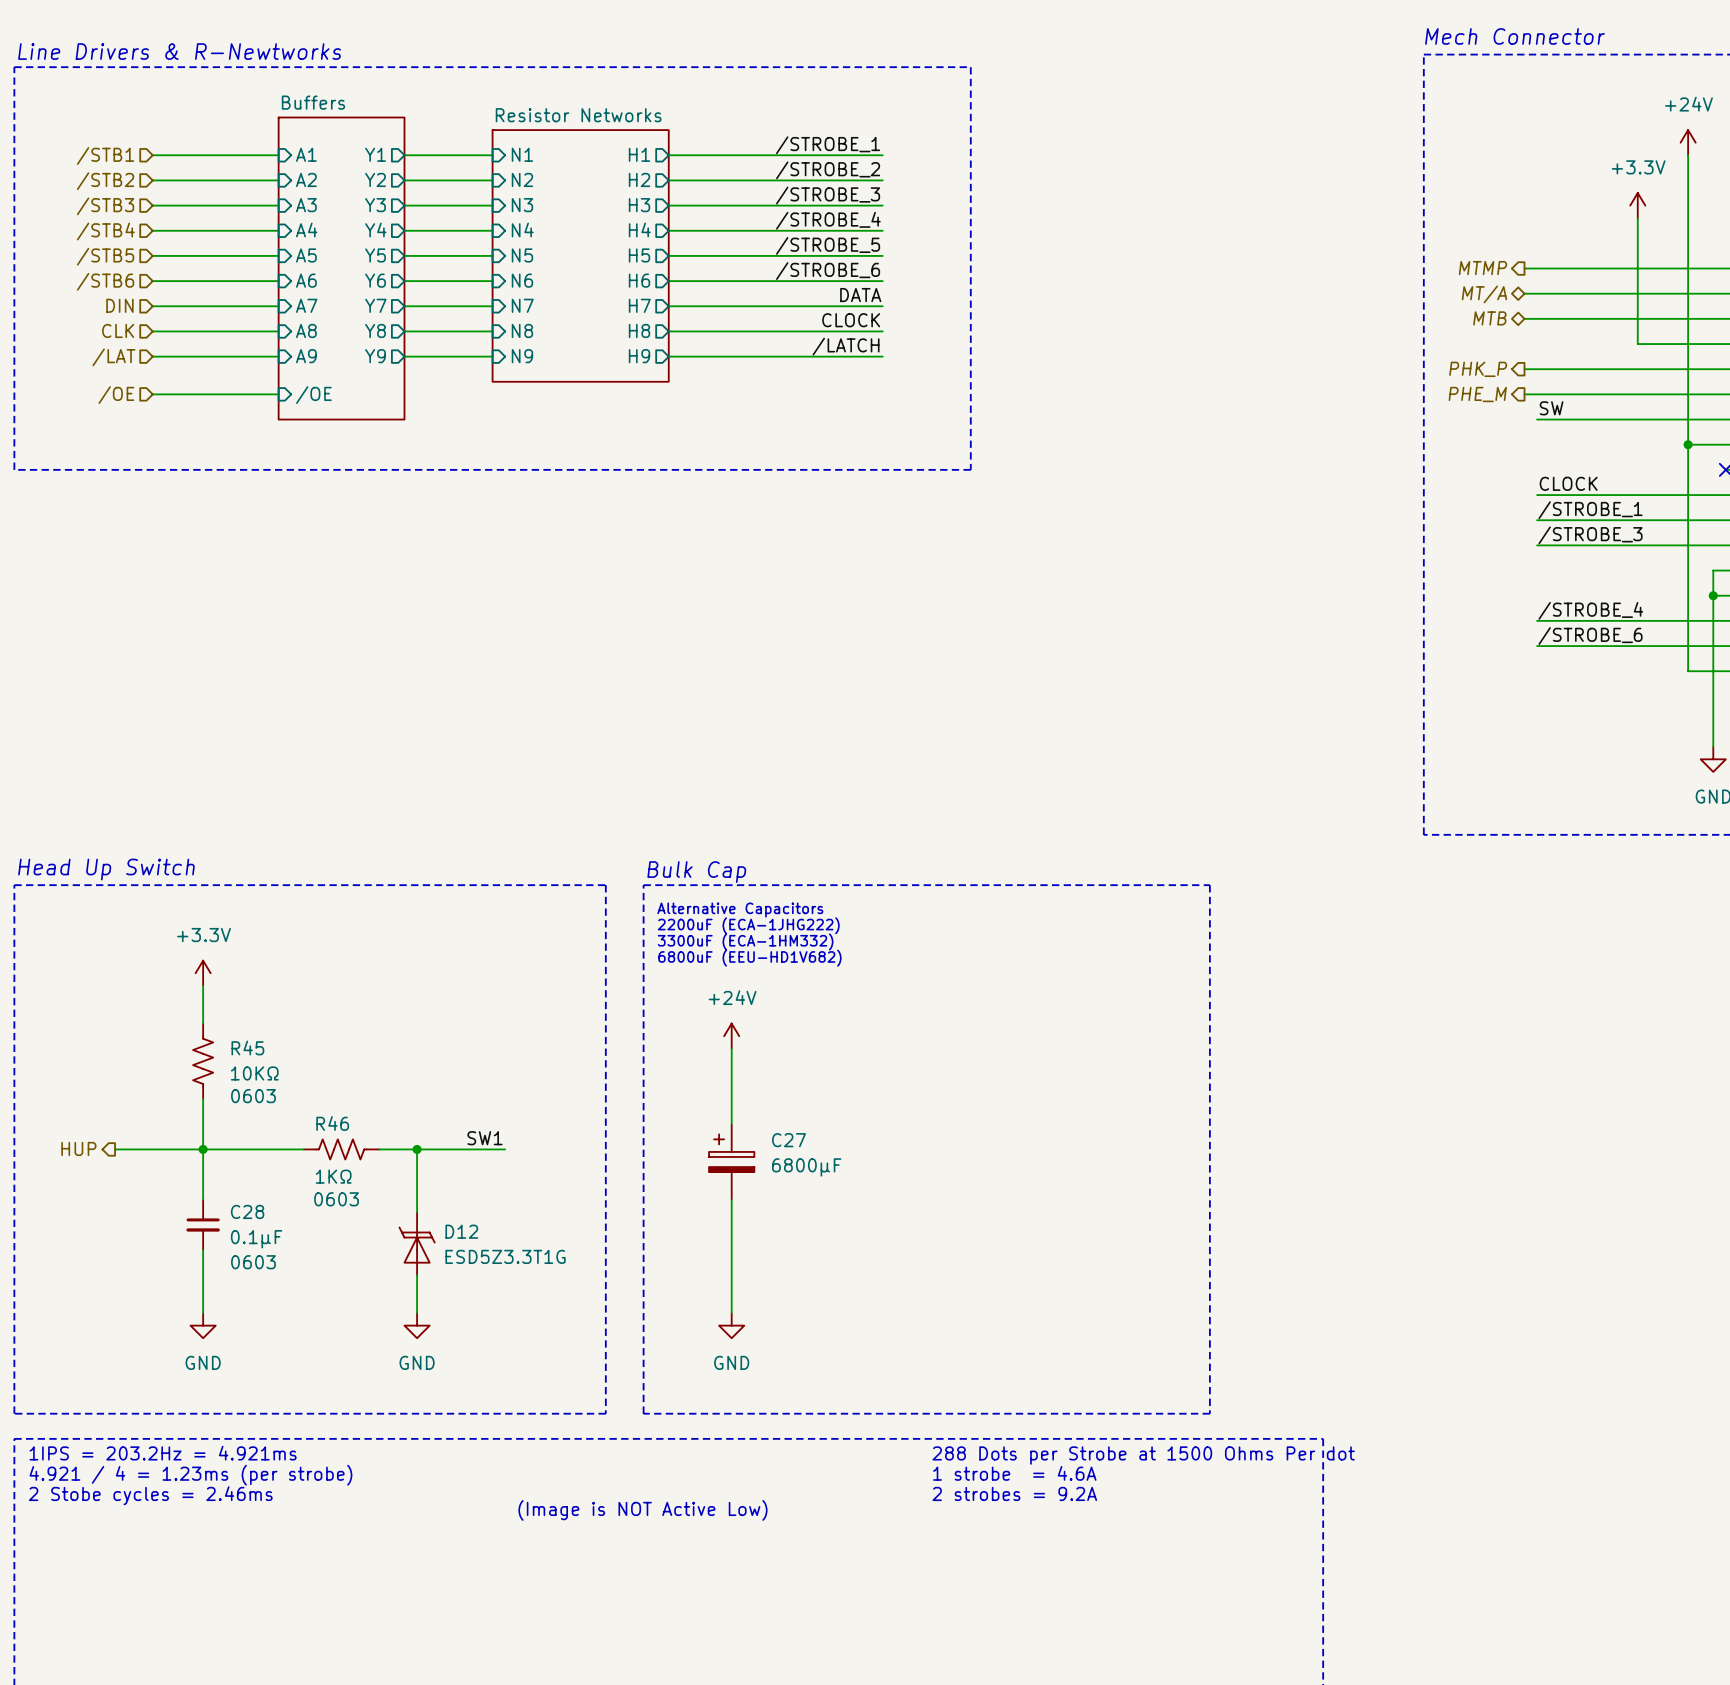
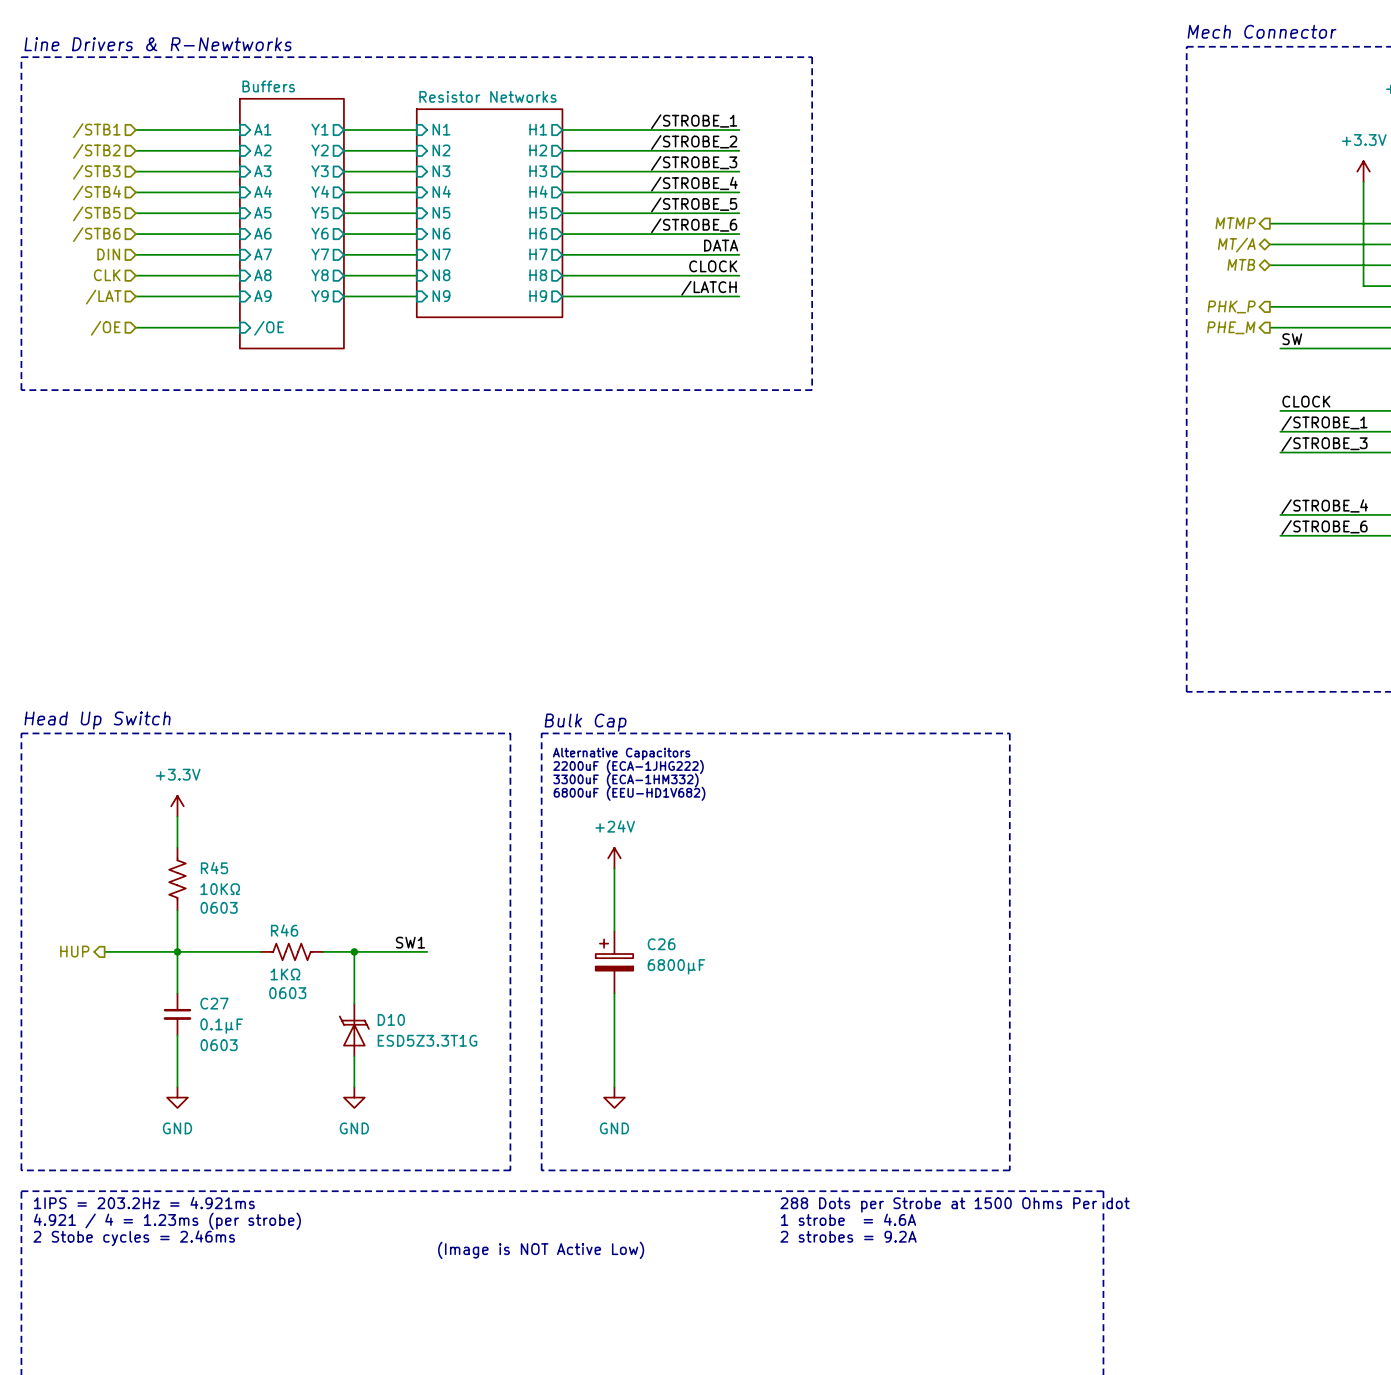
C27 name: C27 (789, 1140) -> C26 (661, 944)
C28 name: C28 (247, 1211) -> C27 (214, 1003)
D12 name: D12 (461, 1231) -> D10 (391, 1019)

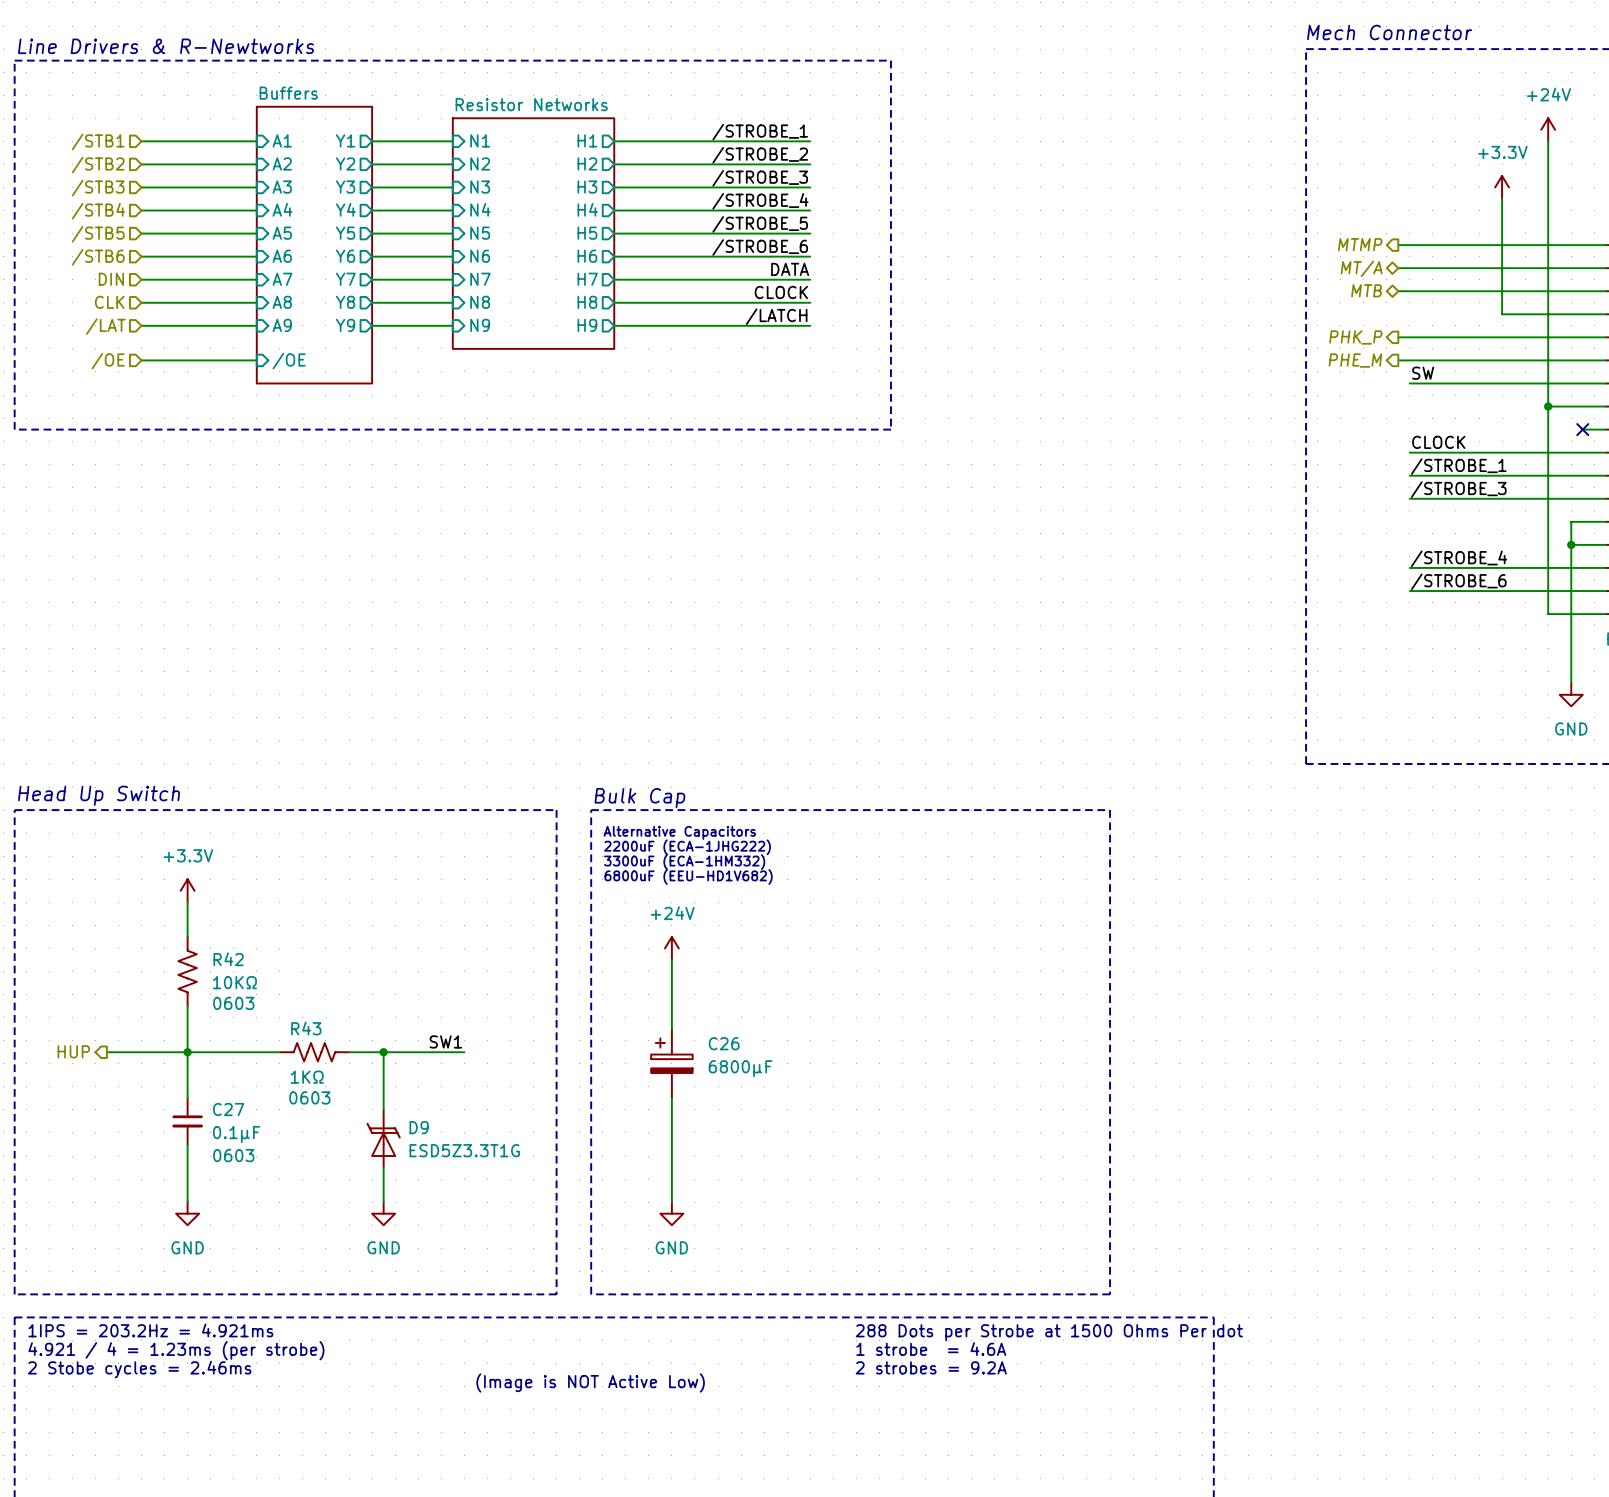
R45 name: R45 (214, 868) -> R42 (228, 959)
R46 name: R46 (284, 930) -> R43 (306, 1028)
D10 name: D10 (391, 1019) -> D9 (419, 1127)

